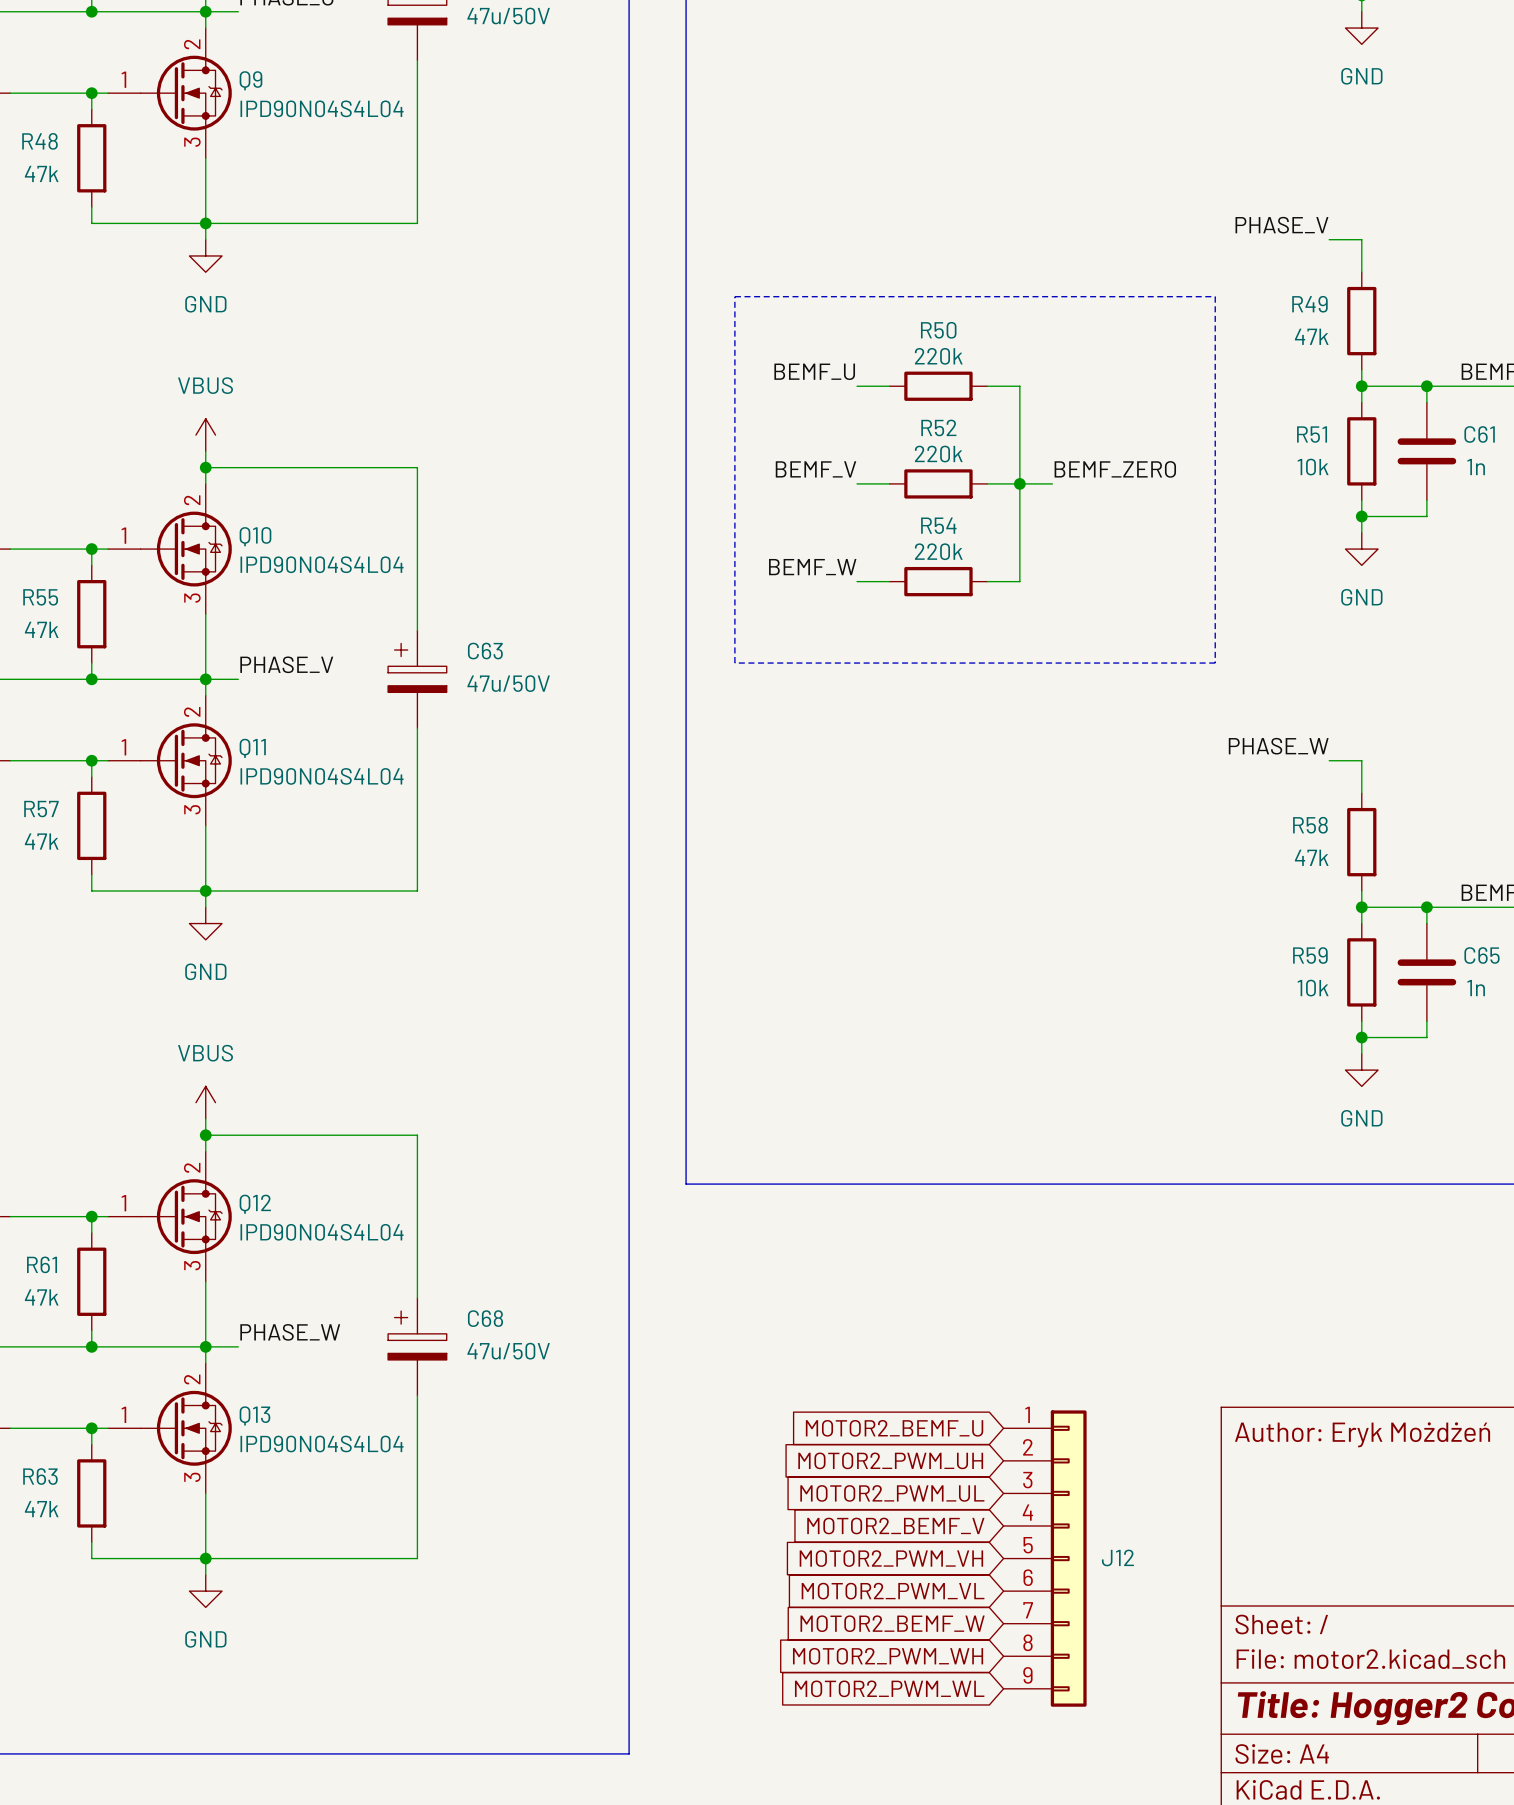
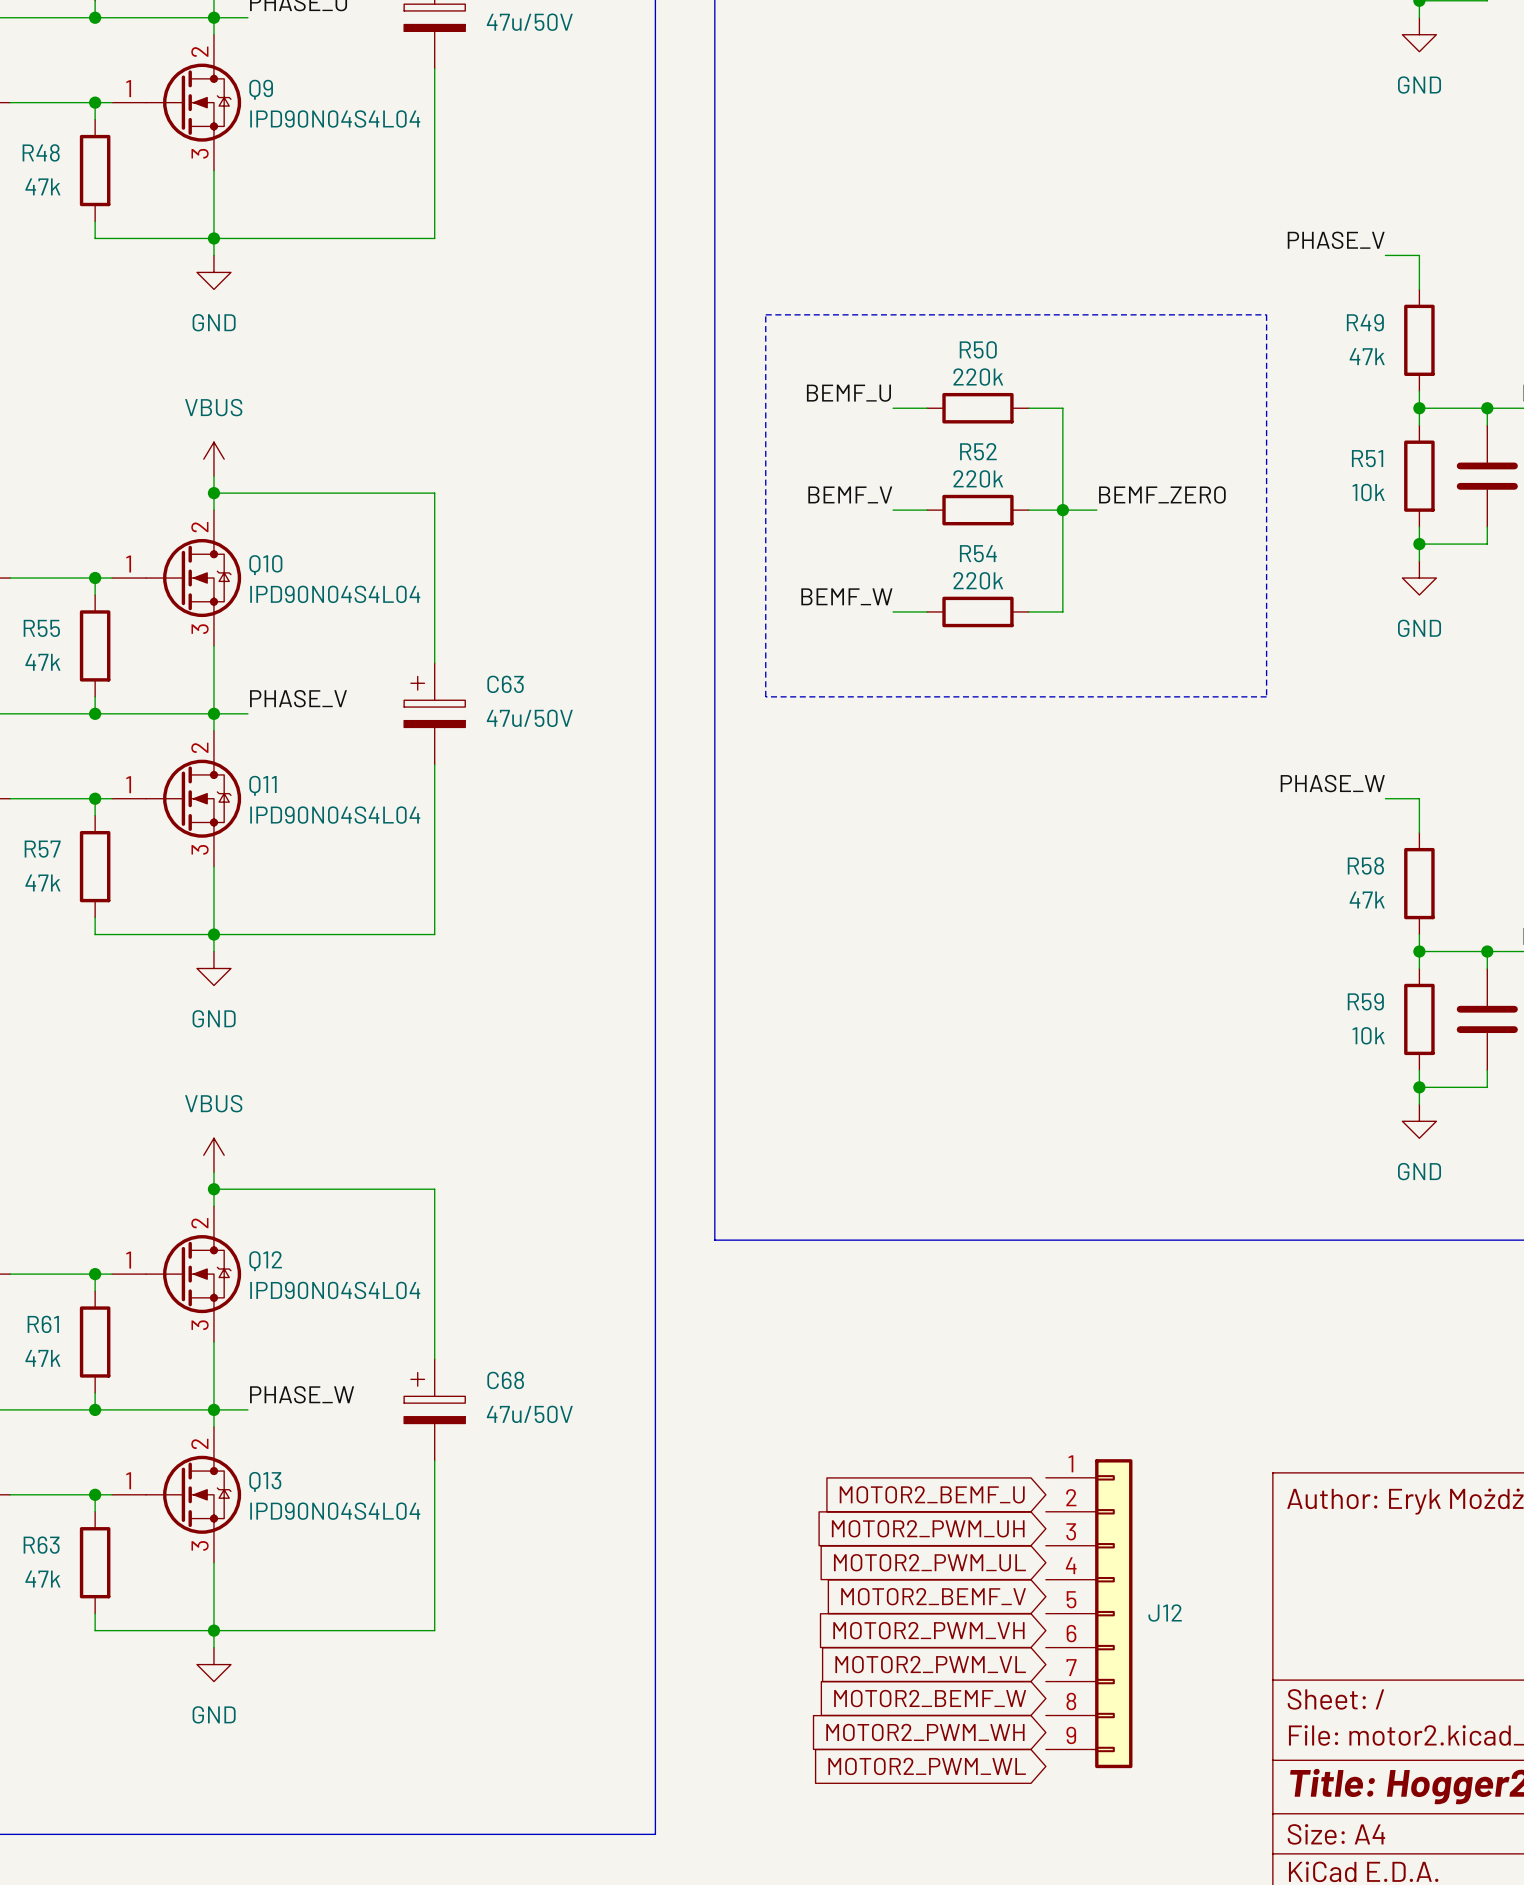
J12 position: (1045, 1558) -> (1089, 1613)

